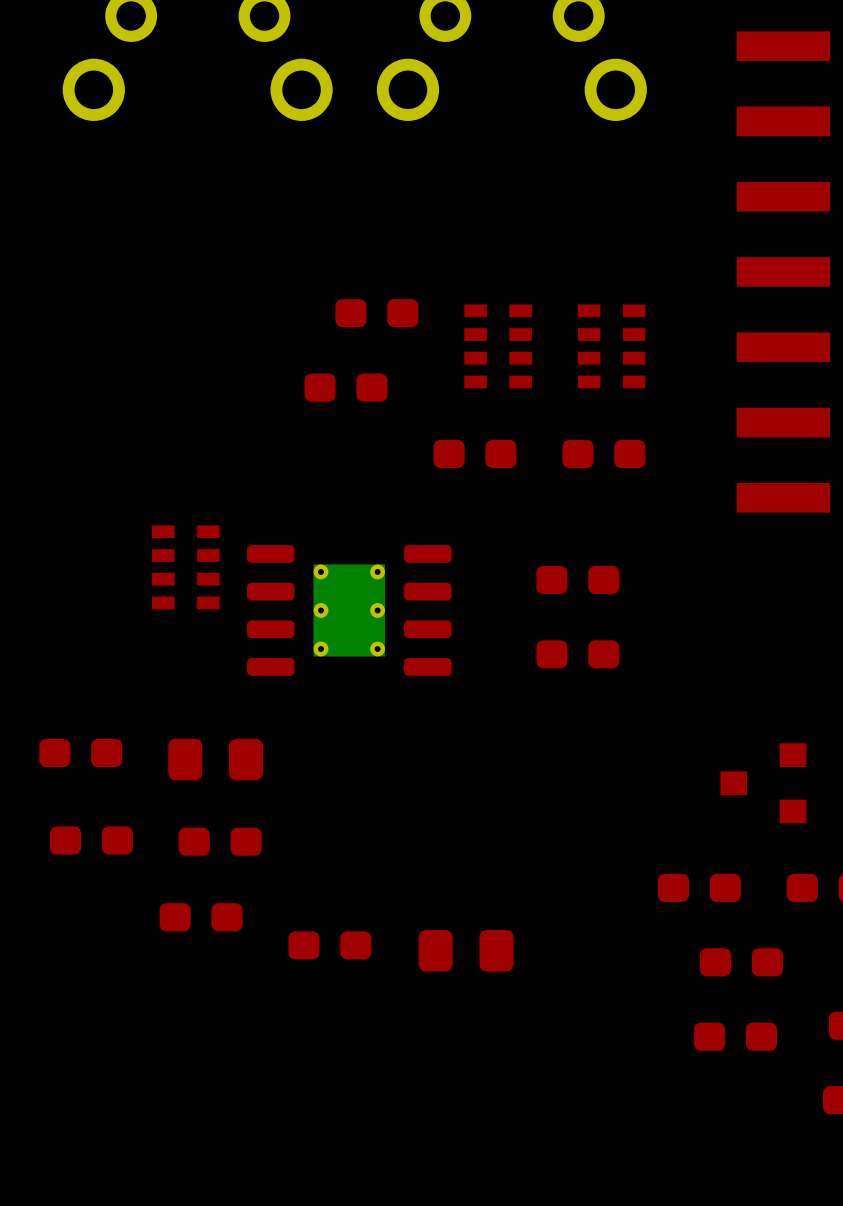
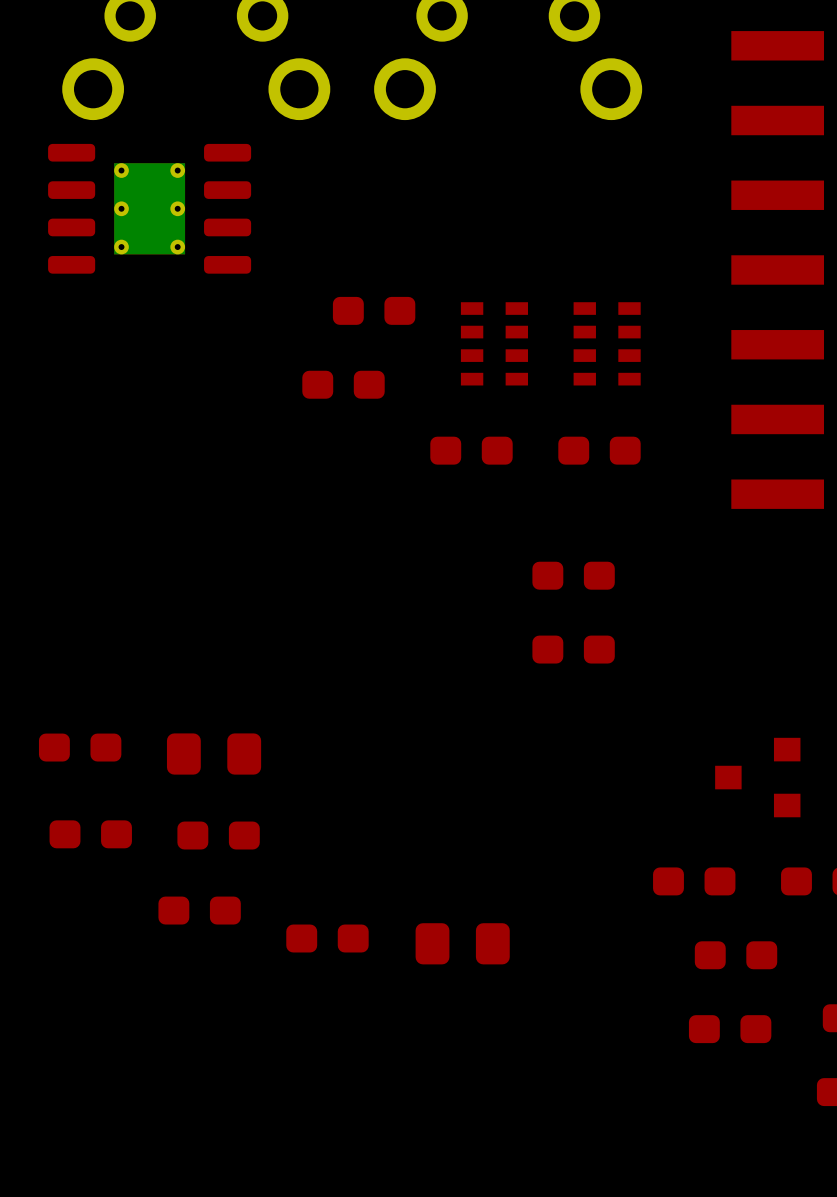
part: (185, 567) -> none
part position: (349, 610) -> (149, 208)

